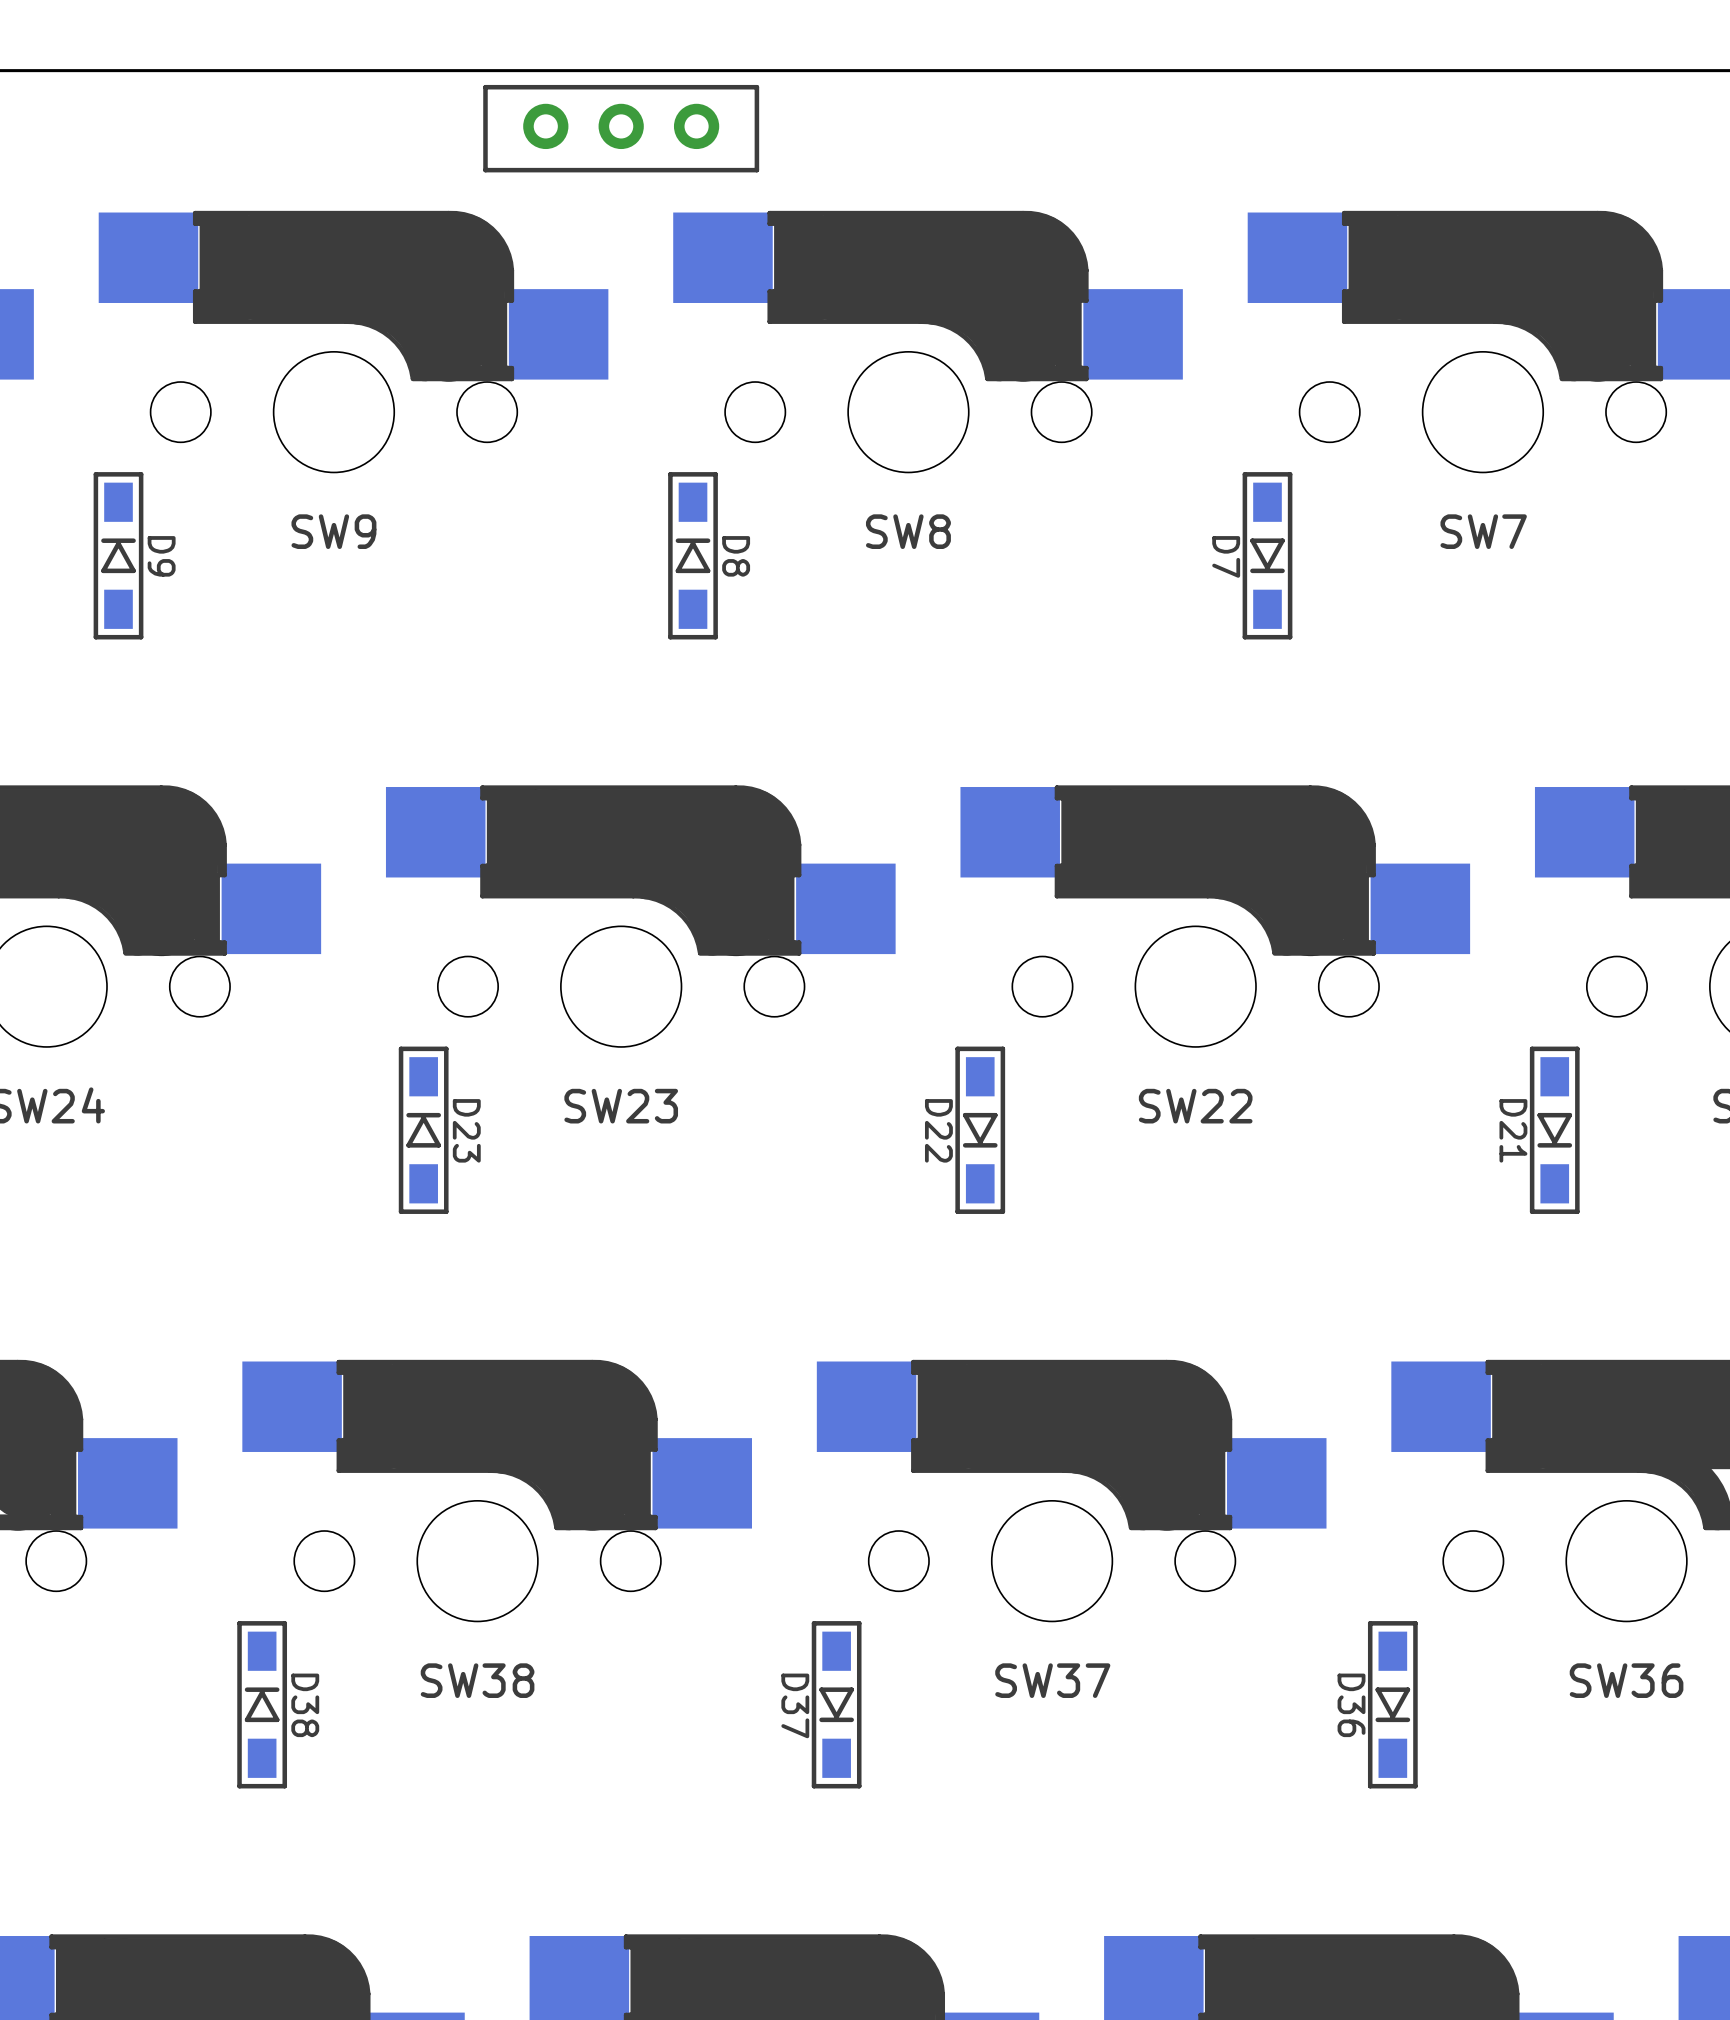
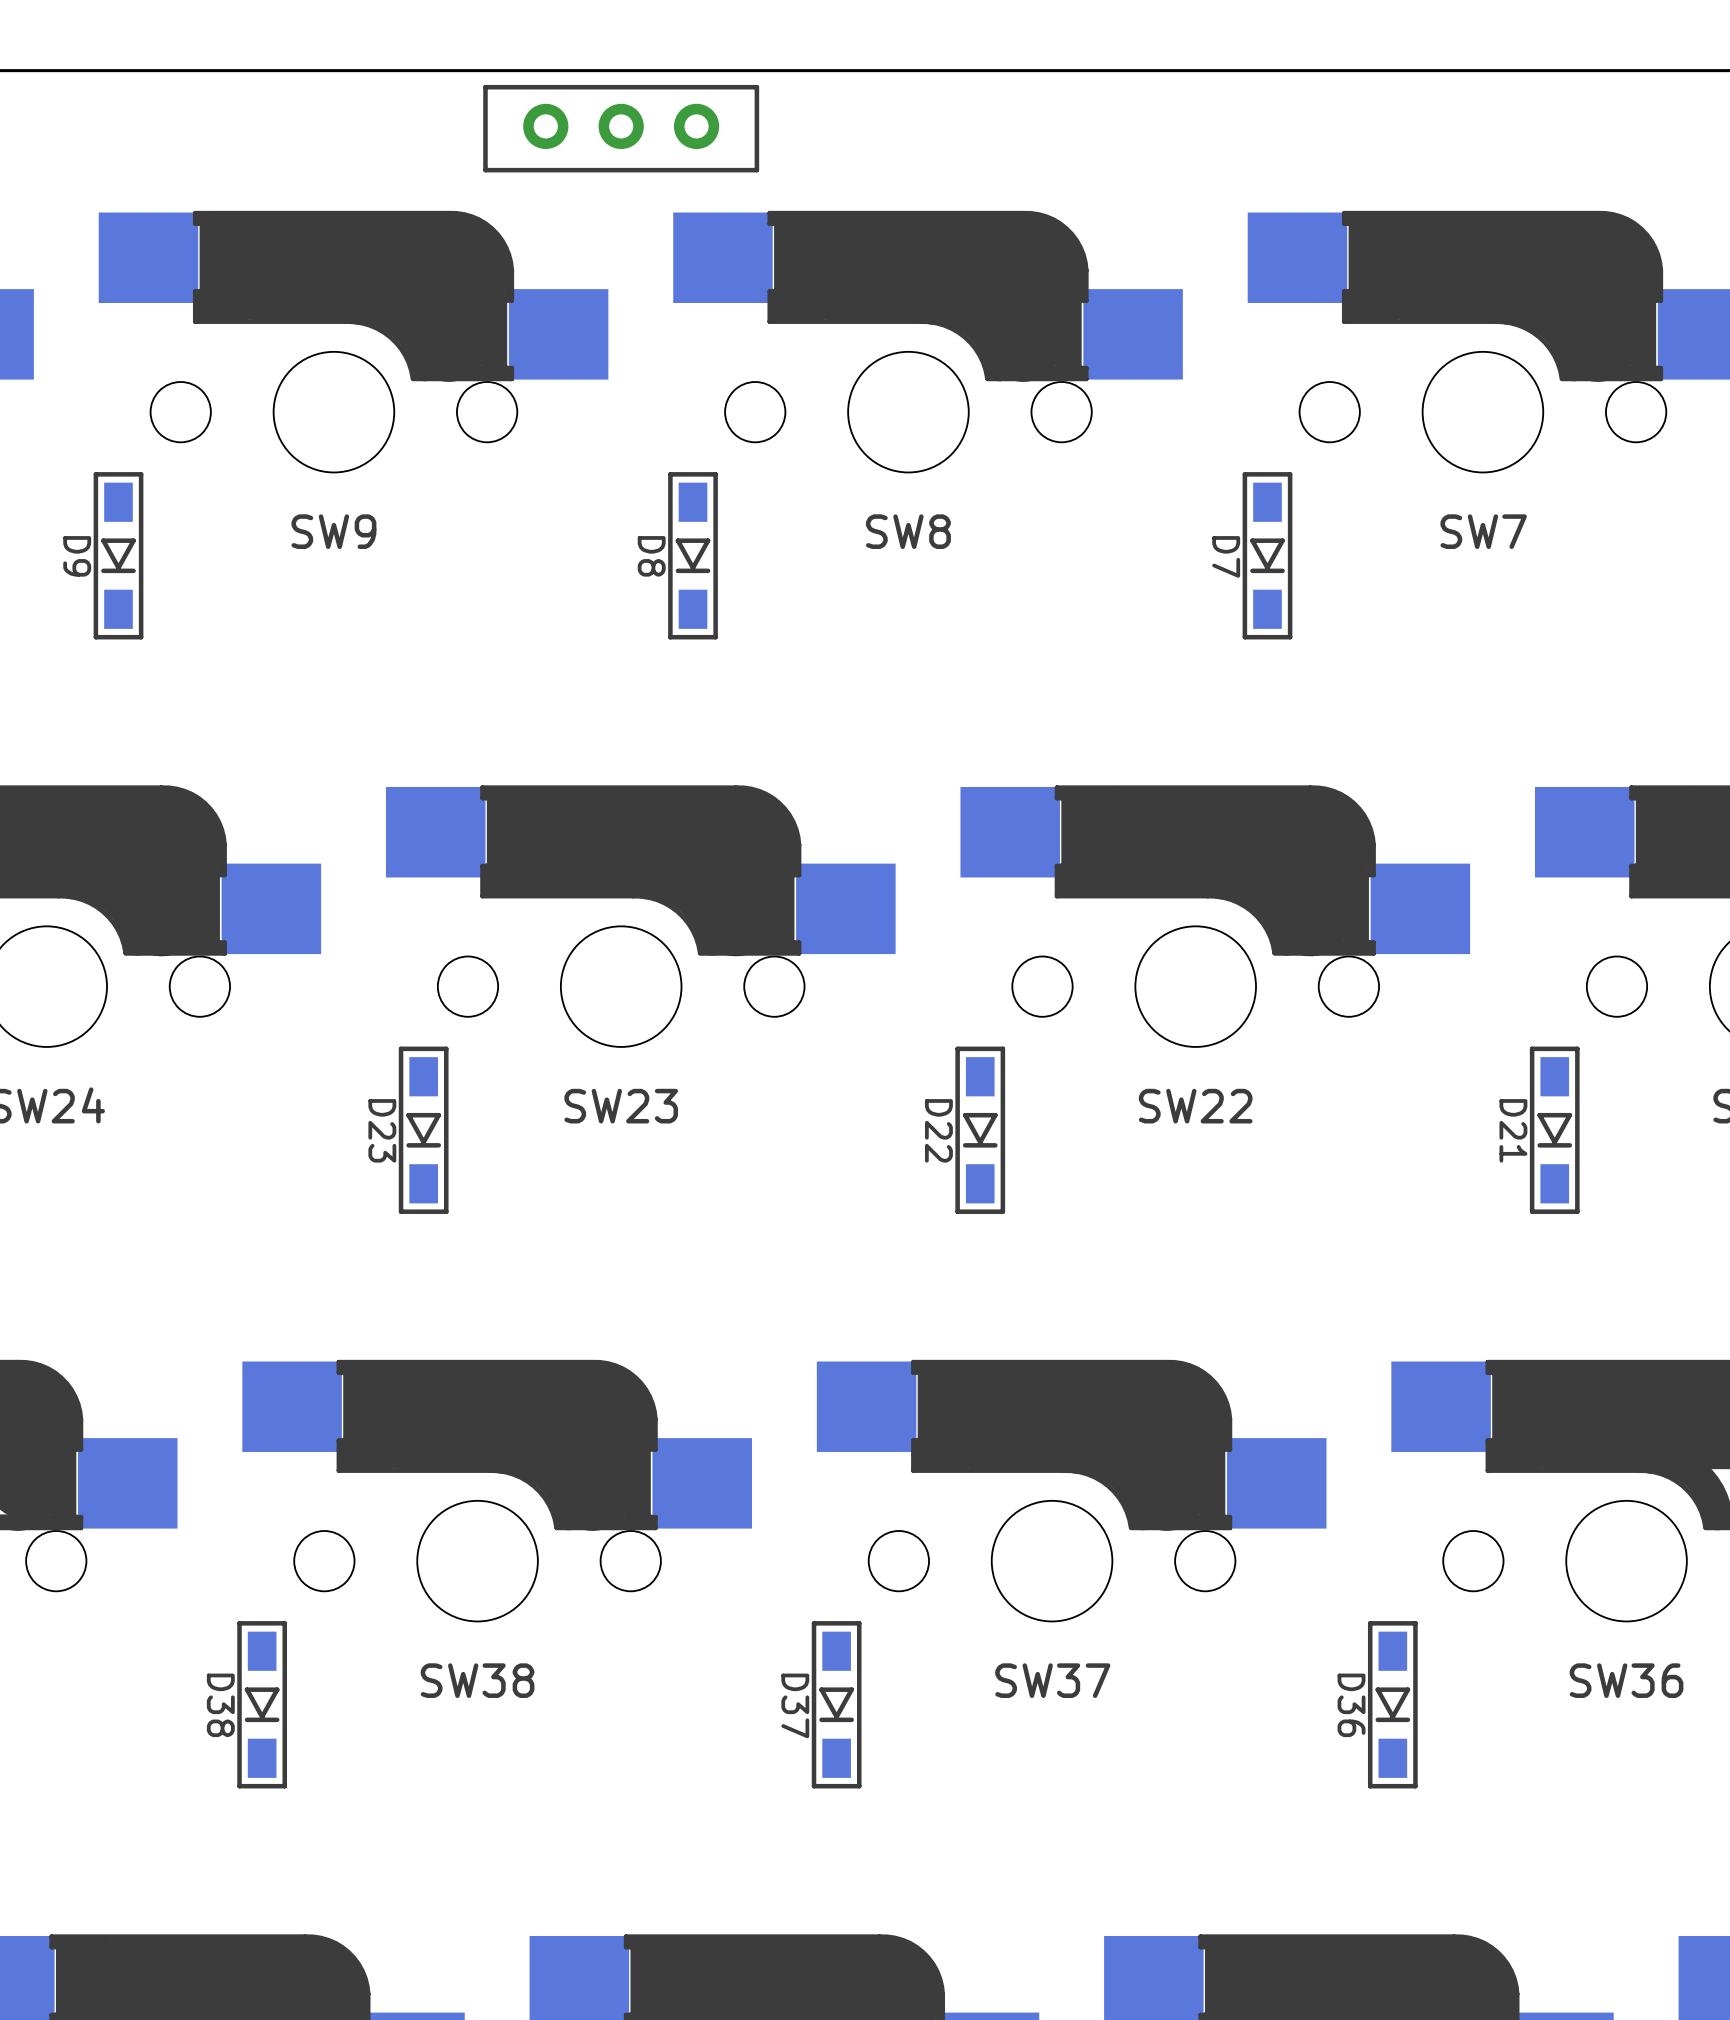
D9 rotation: 0° (118, 555) -> 180° (118, 555)
D8 rotation: 0° (693, 555) -> 180° (693, 555)
D23 rotation: 0° (423, 1130) -> 180° (423, 1130)
D38 rotation: 0° (262, 1704) -> 180° (262, 1704)

